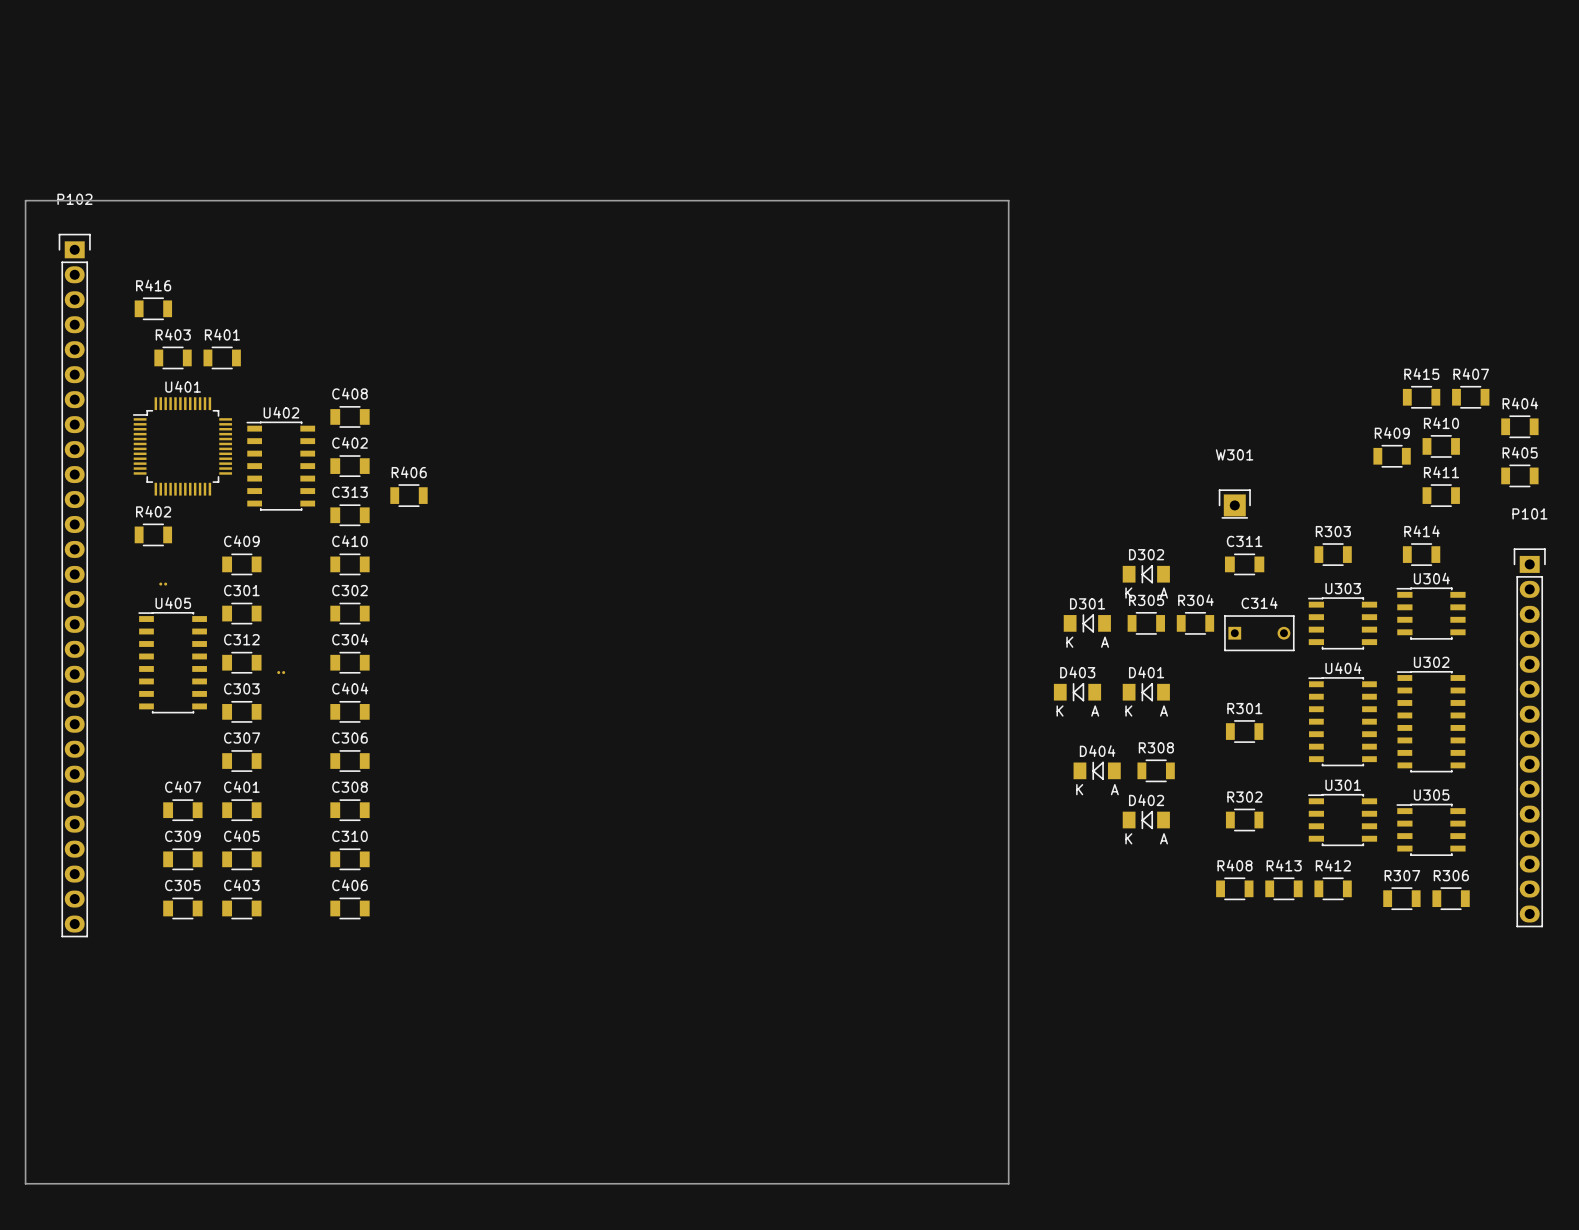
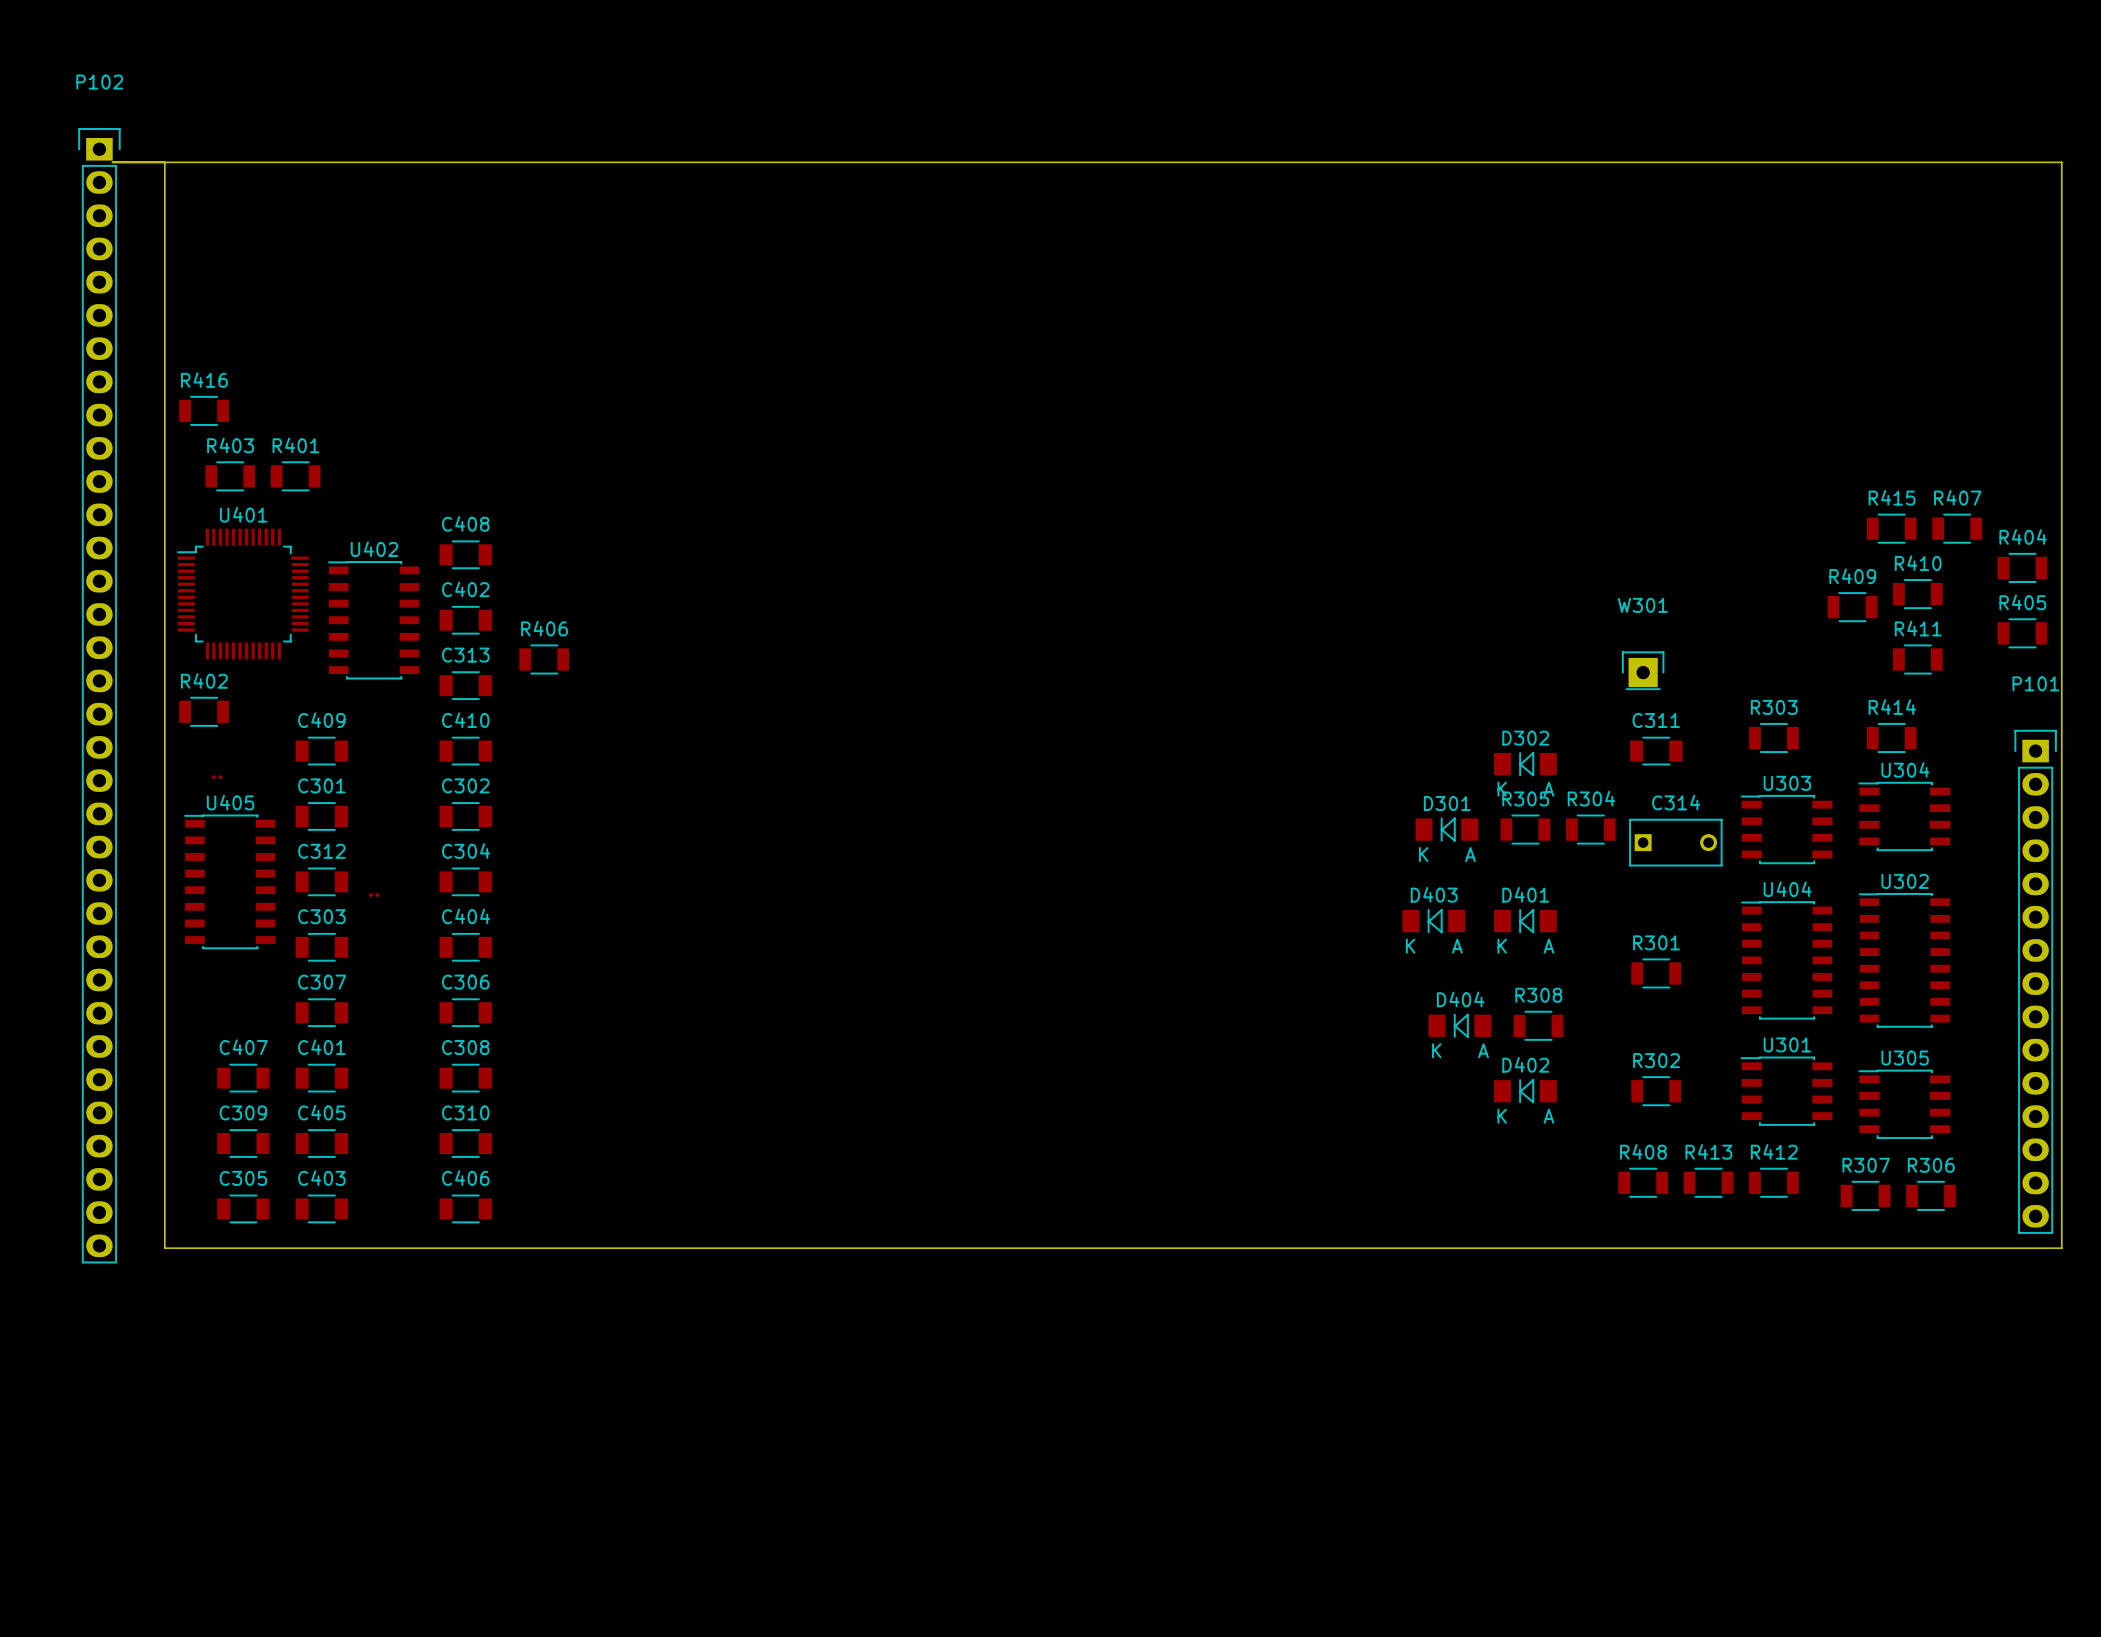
board edge: none -> (112, 162) (2061, 162) (2061, 1248) (164, 1248) (164, 162)
P102 name position: P102 (74, 199) -> P102 (99, 82)
board edge: (25, 200) (25, 1183) (1008, 1183) (1008, 200) (25, 200) -> none
P102 footprint: [58, 233, 91, 938] -> [78, 128, 121, 1264]

